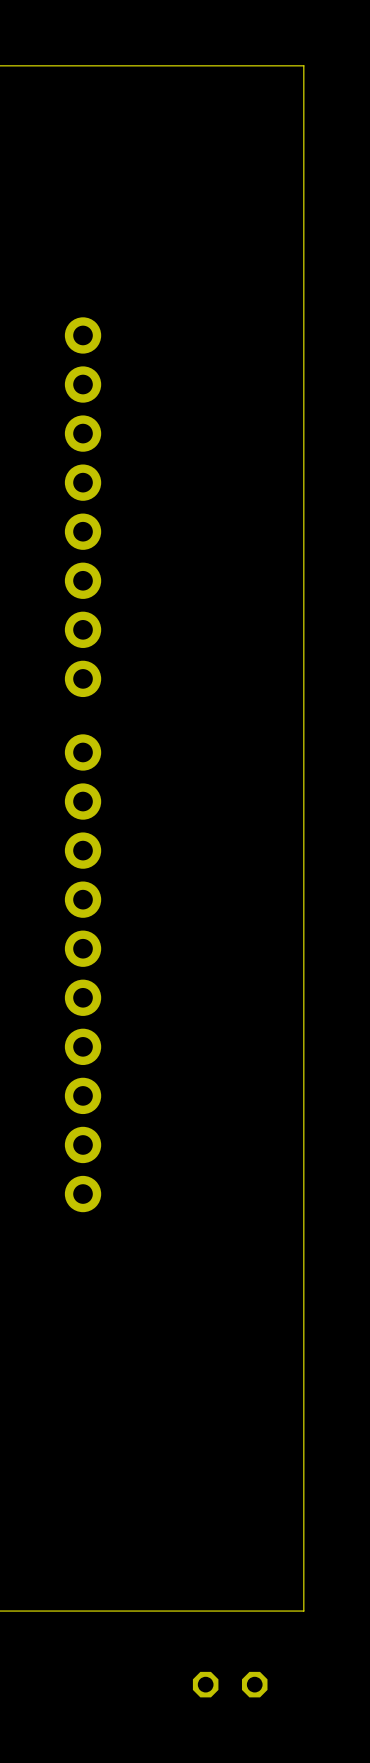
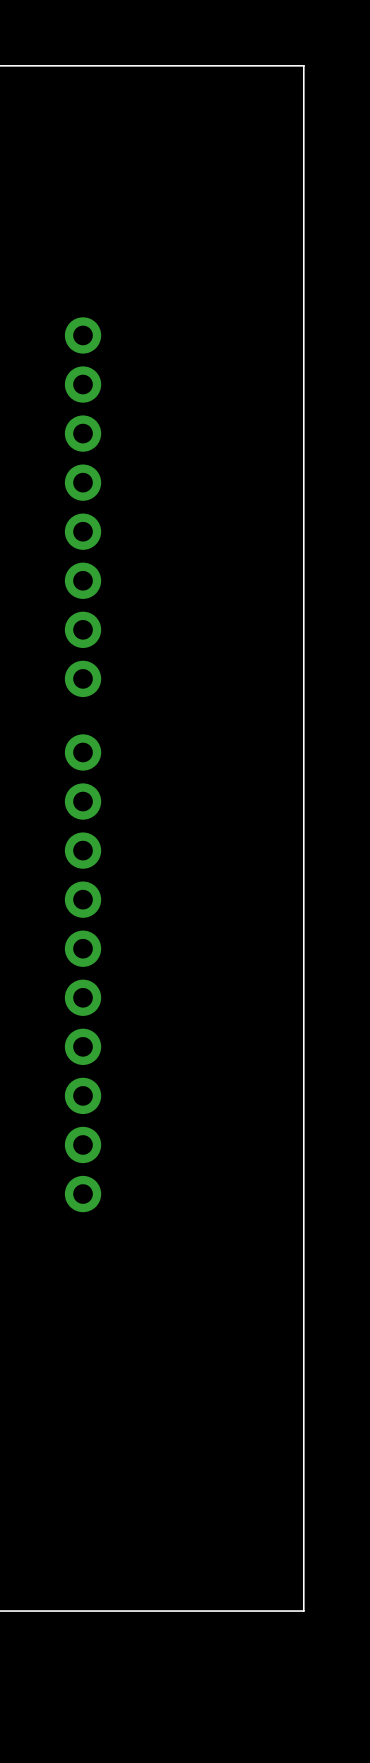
part: (230, 1684) -> none

